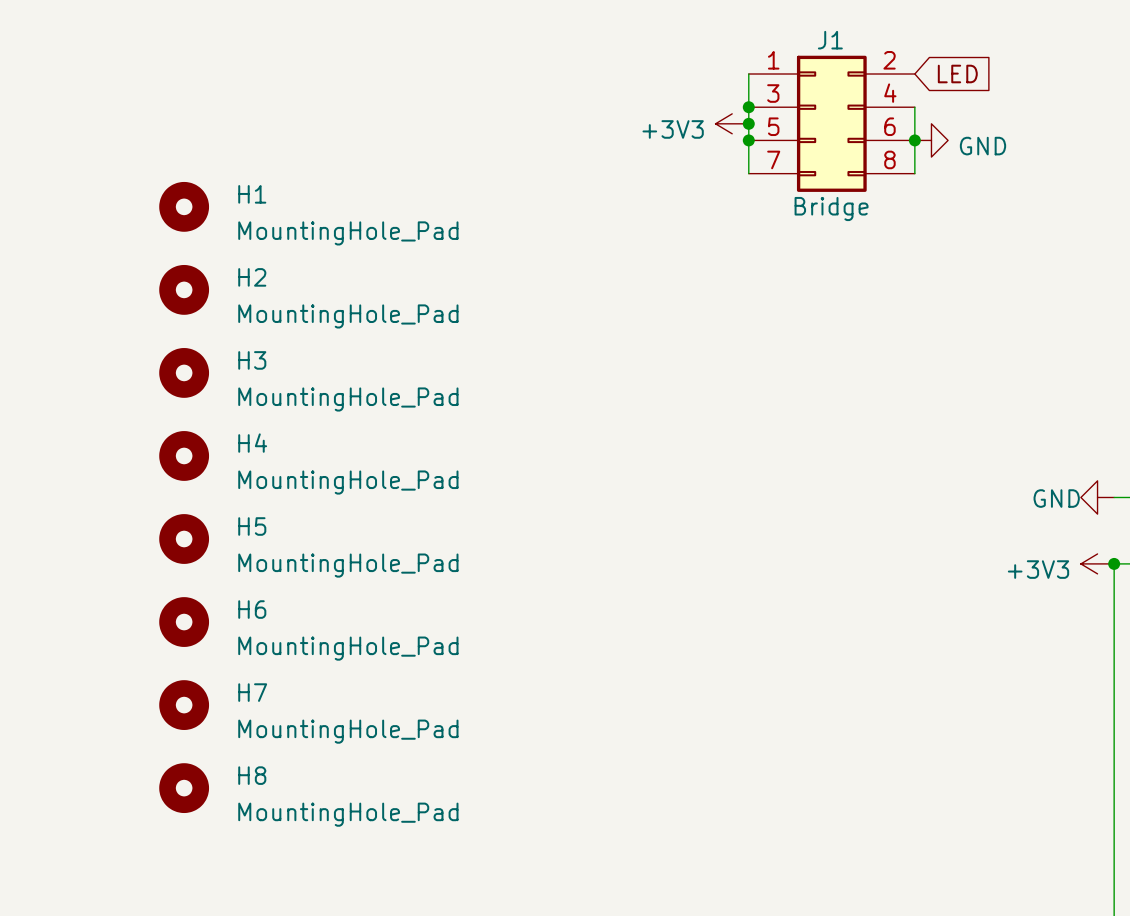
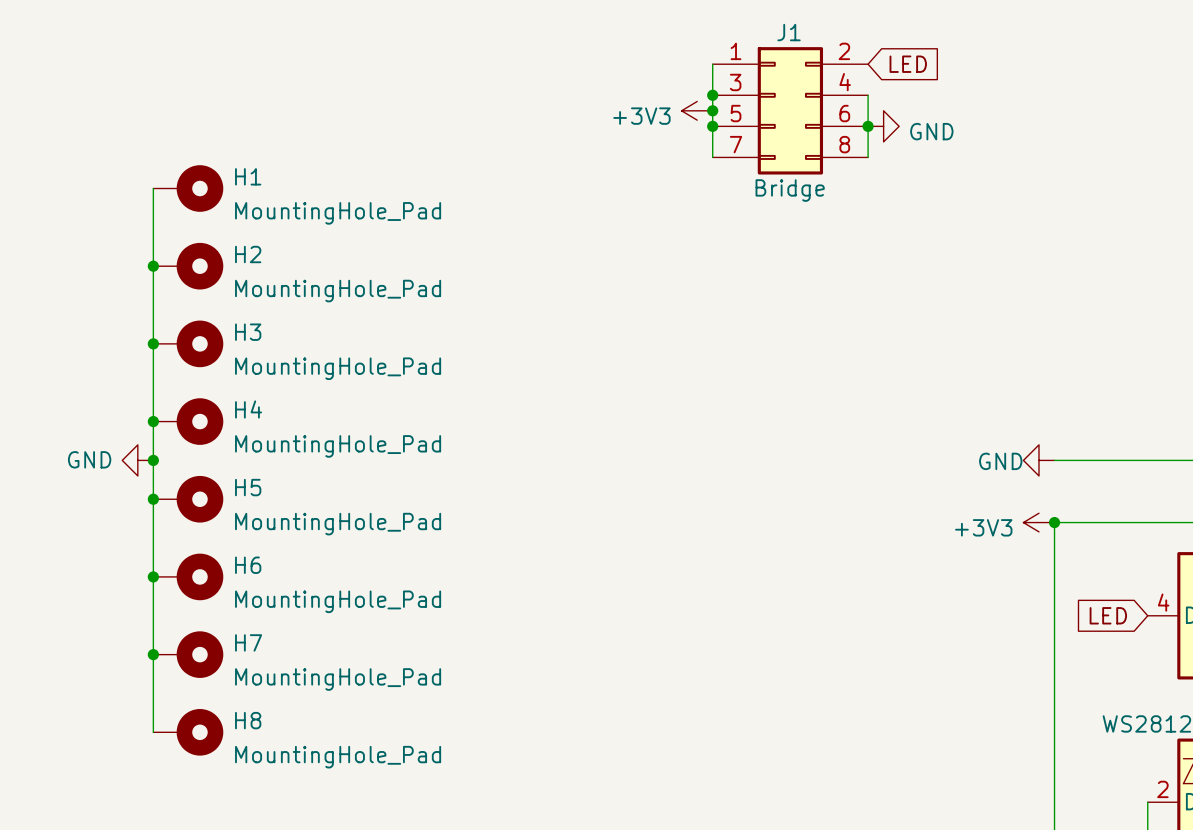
H1 symbol: [159, 181, 210, 232] -> [153, 165, 224, 212]
wire: none -> (153, 188) (153, 732)
H2 symbol: [159, 264, 210, 315] -> [153, 242, 224, 290]
junction: none -> (153, 266)
H3 symbol: [159, 348, 210, 398] -> [153, 320, 224, 368]
junction: none -> (153, 343)
H4 symbol: [159, 431, 210, 481] -> [153, 398, 224, 445]
junction: none -> (153, 421)
power symbol: none -> GND (137, 460)
junction: none -> (153, 460)
H5 symbol: [159, 514, 210, 564] -> [153, 475, 224, 523]
junction: none -> (153, 499)
H6 symbol: [159, 597, 210, 647] -> [153, 553, 224, 601]
junction: none -> (153, 576)
H7 symbol: [159, 680, 210, 730] -> [153, 631, 224, 678]
junction: none -> (153, 654)
H8 symbol: [159, 763, 210, 814] -> [153, 709, 224, 756]

